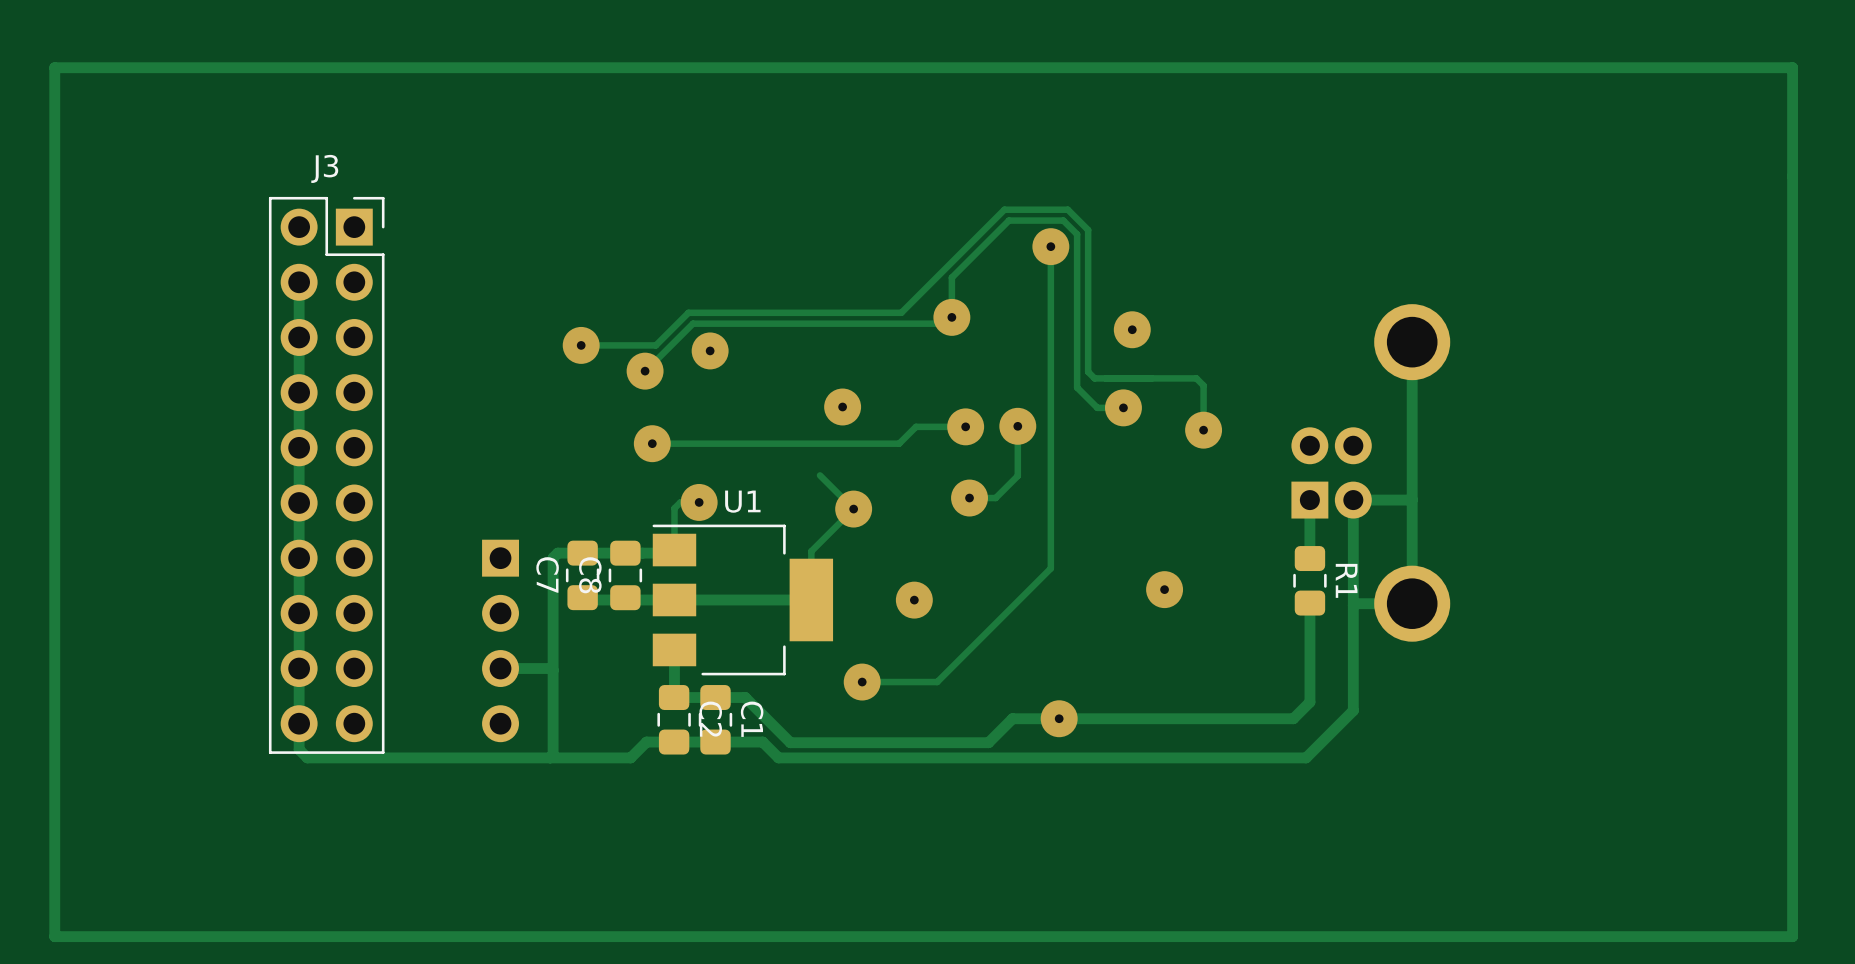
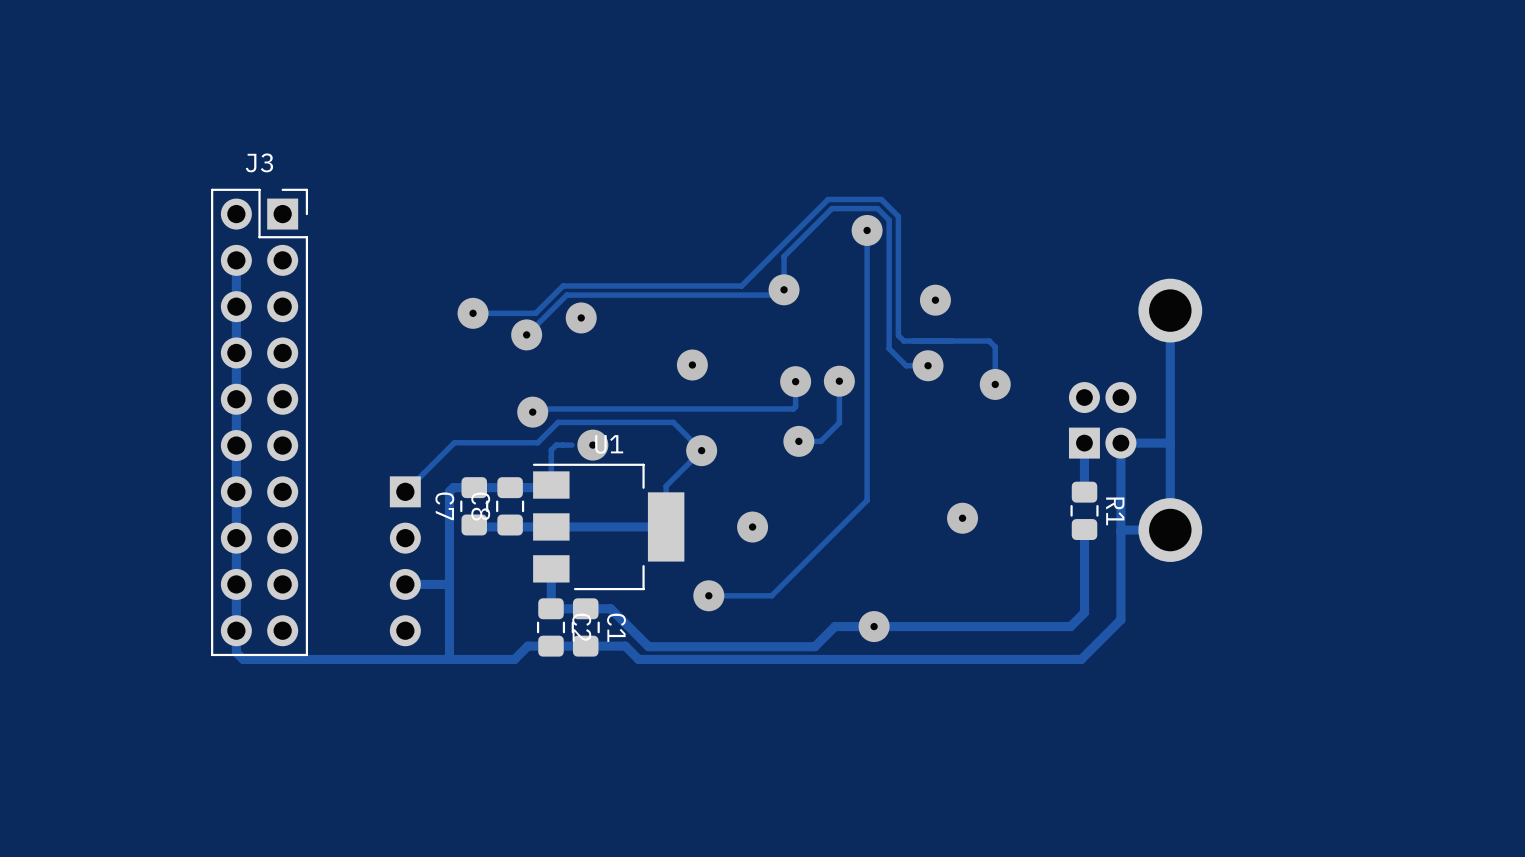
track: (1792, 67) (1792, 936) (54, 936) (54, 67) (1792, 67) -> none
track: (965, 426) (916, 426) (899, 443) (652, 443) -> (795, 381) (795, 406) (793, 408) (539, 408) (536, 412) (532, 412)
via position: (652, 443) -> (532, 412)
track: none -> (673, 422) (558, 422) (537, 442) (454, 442) (405, 491)
via position: (699, 502) -> (592, 445)

